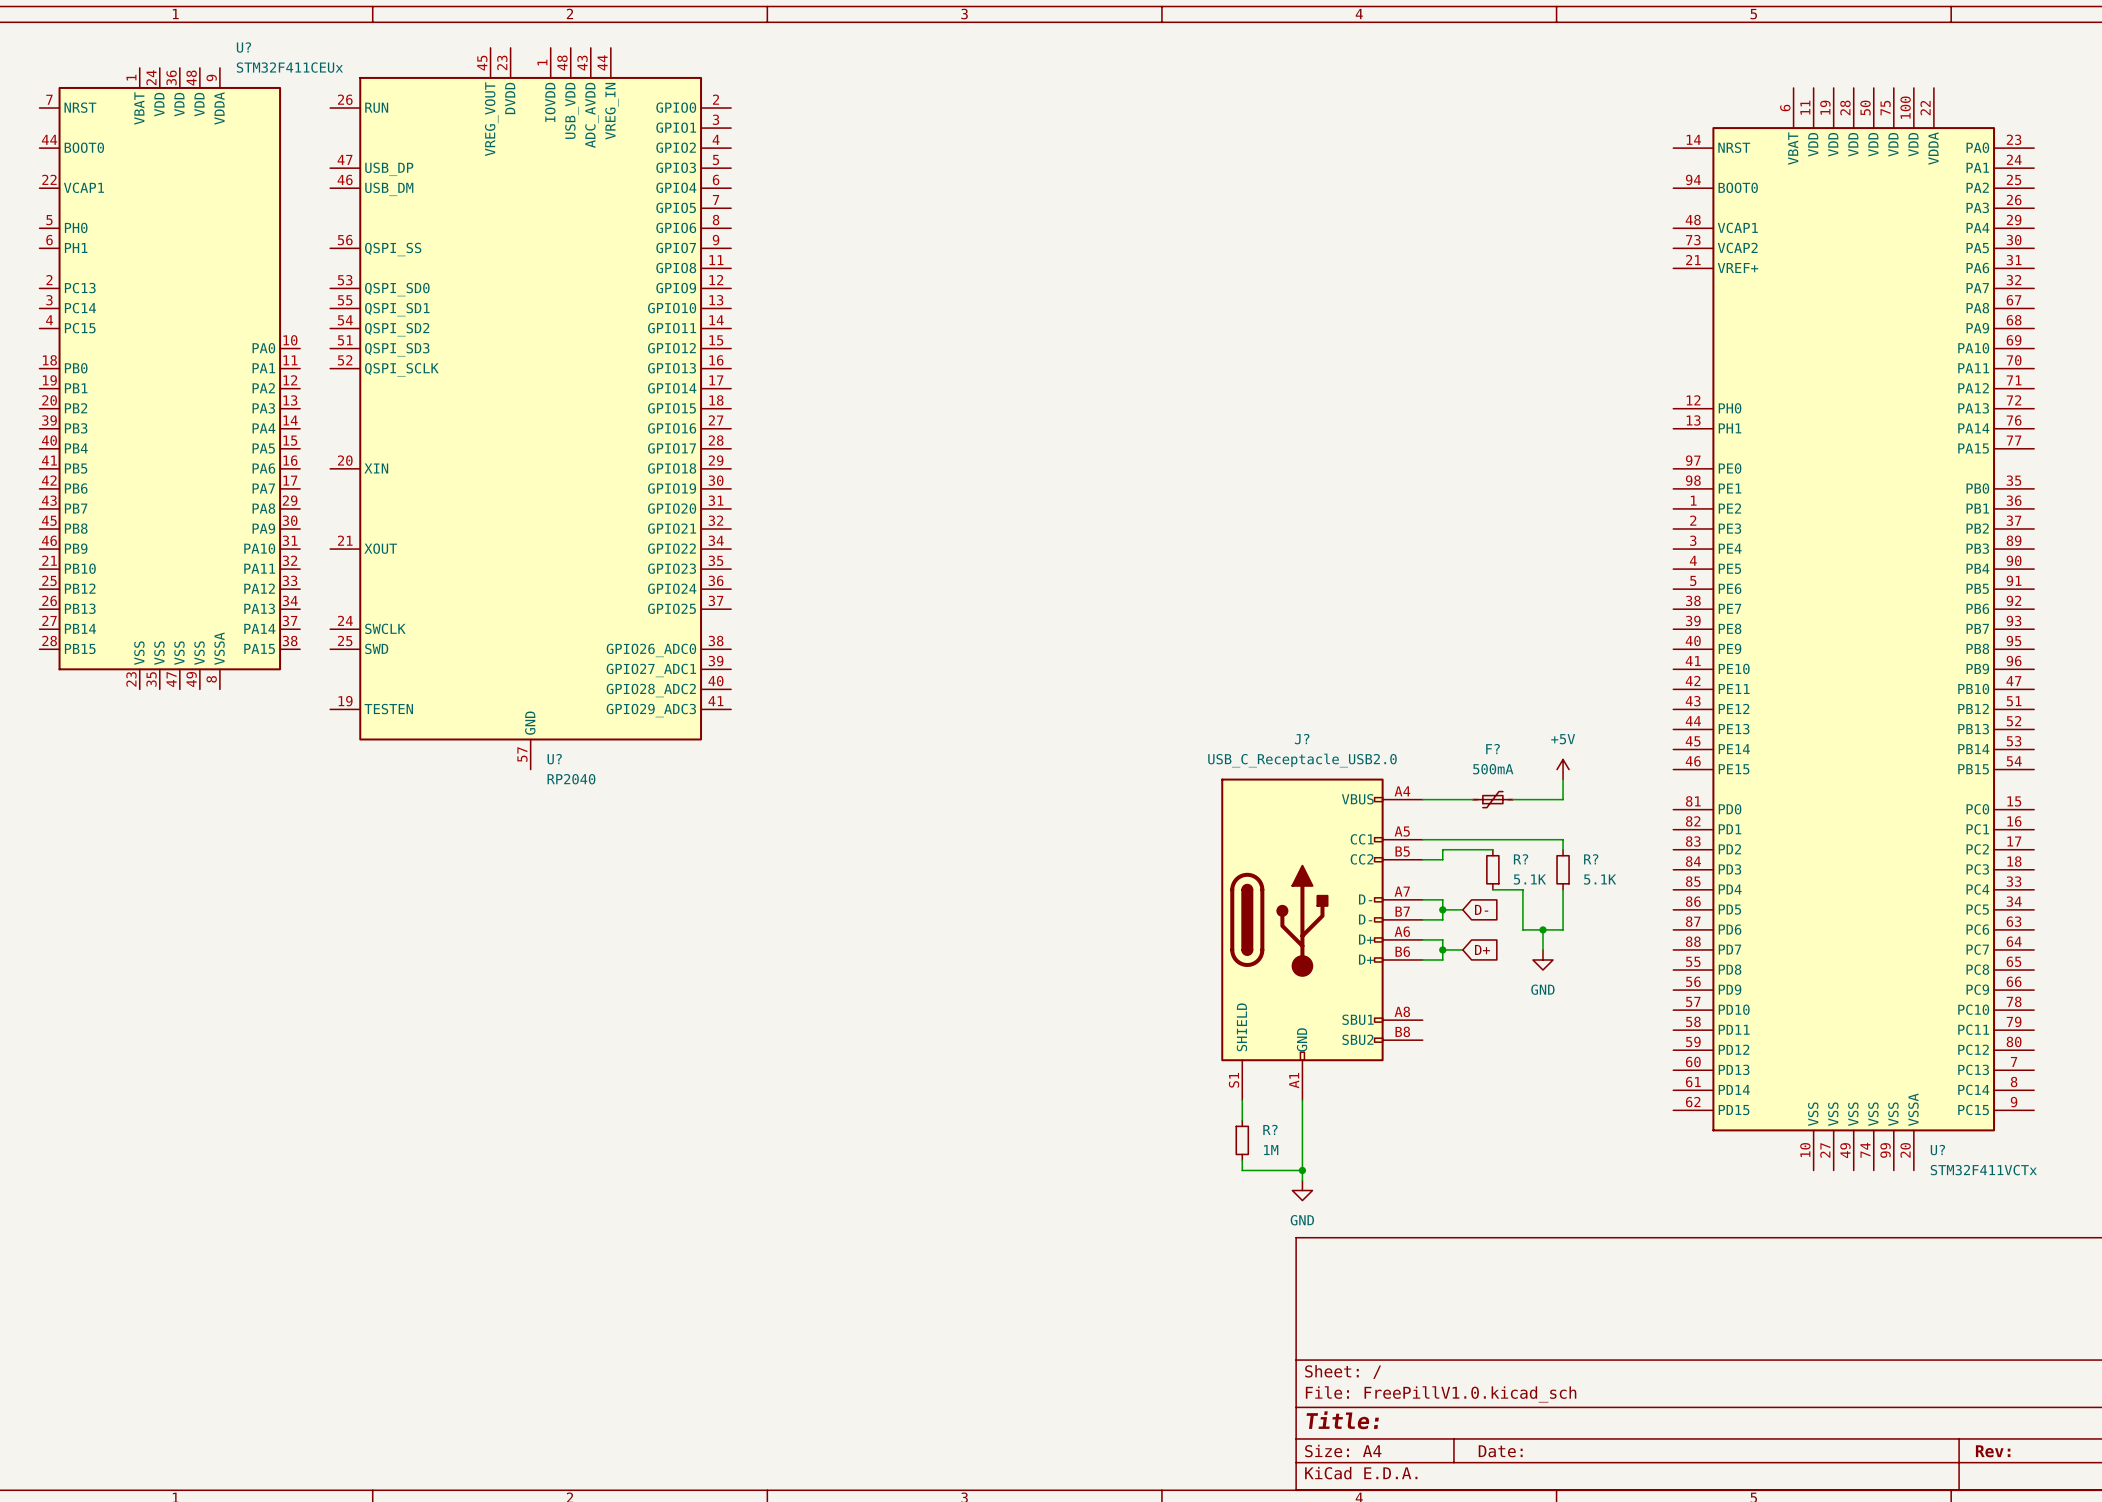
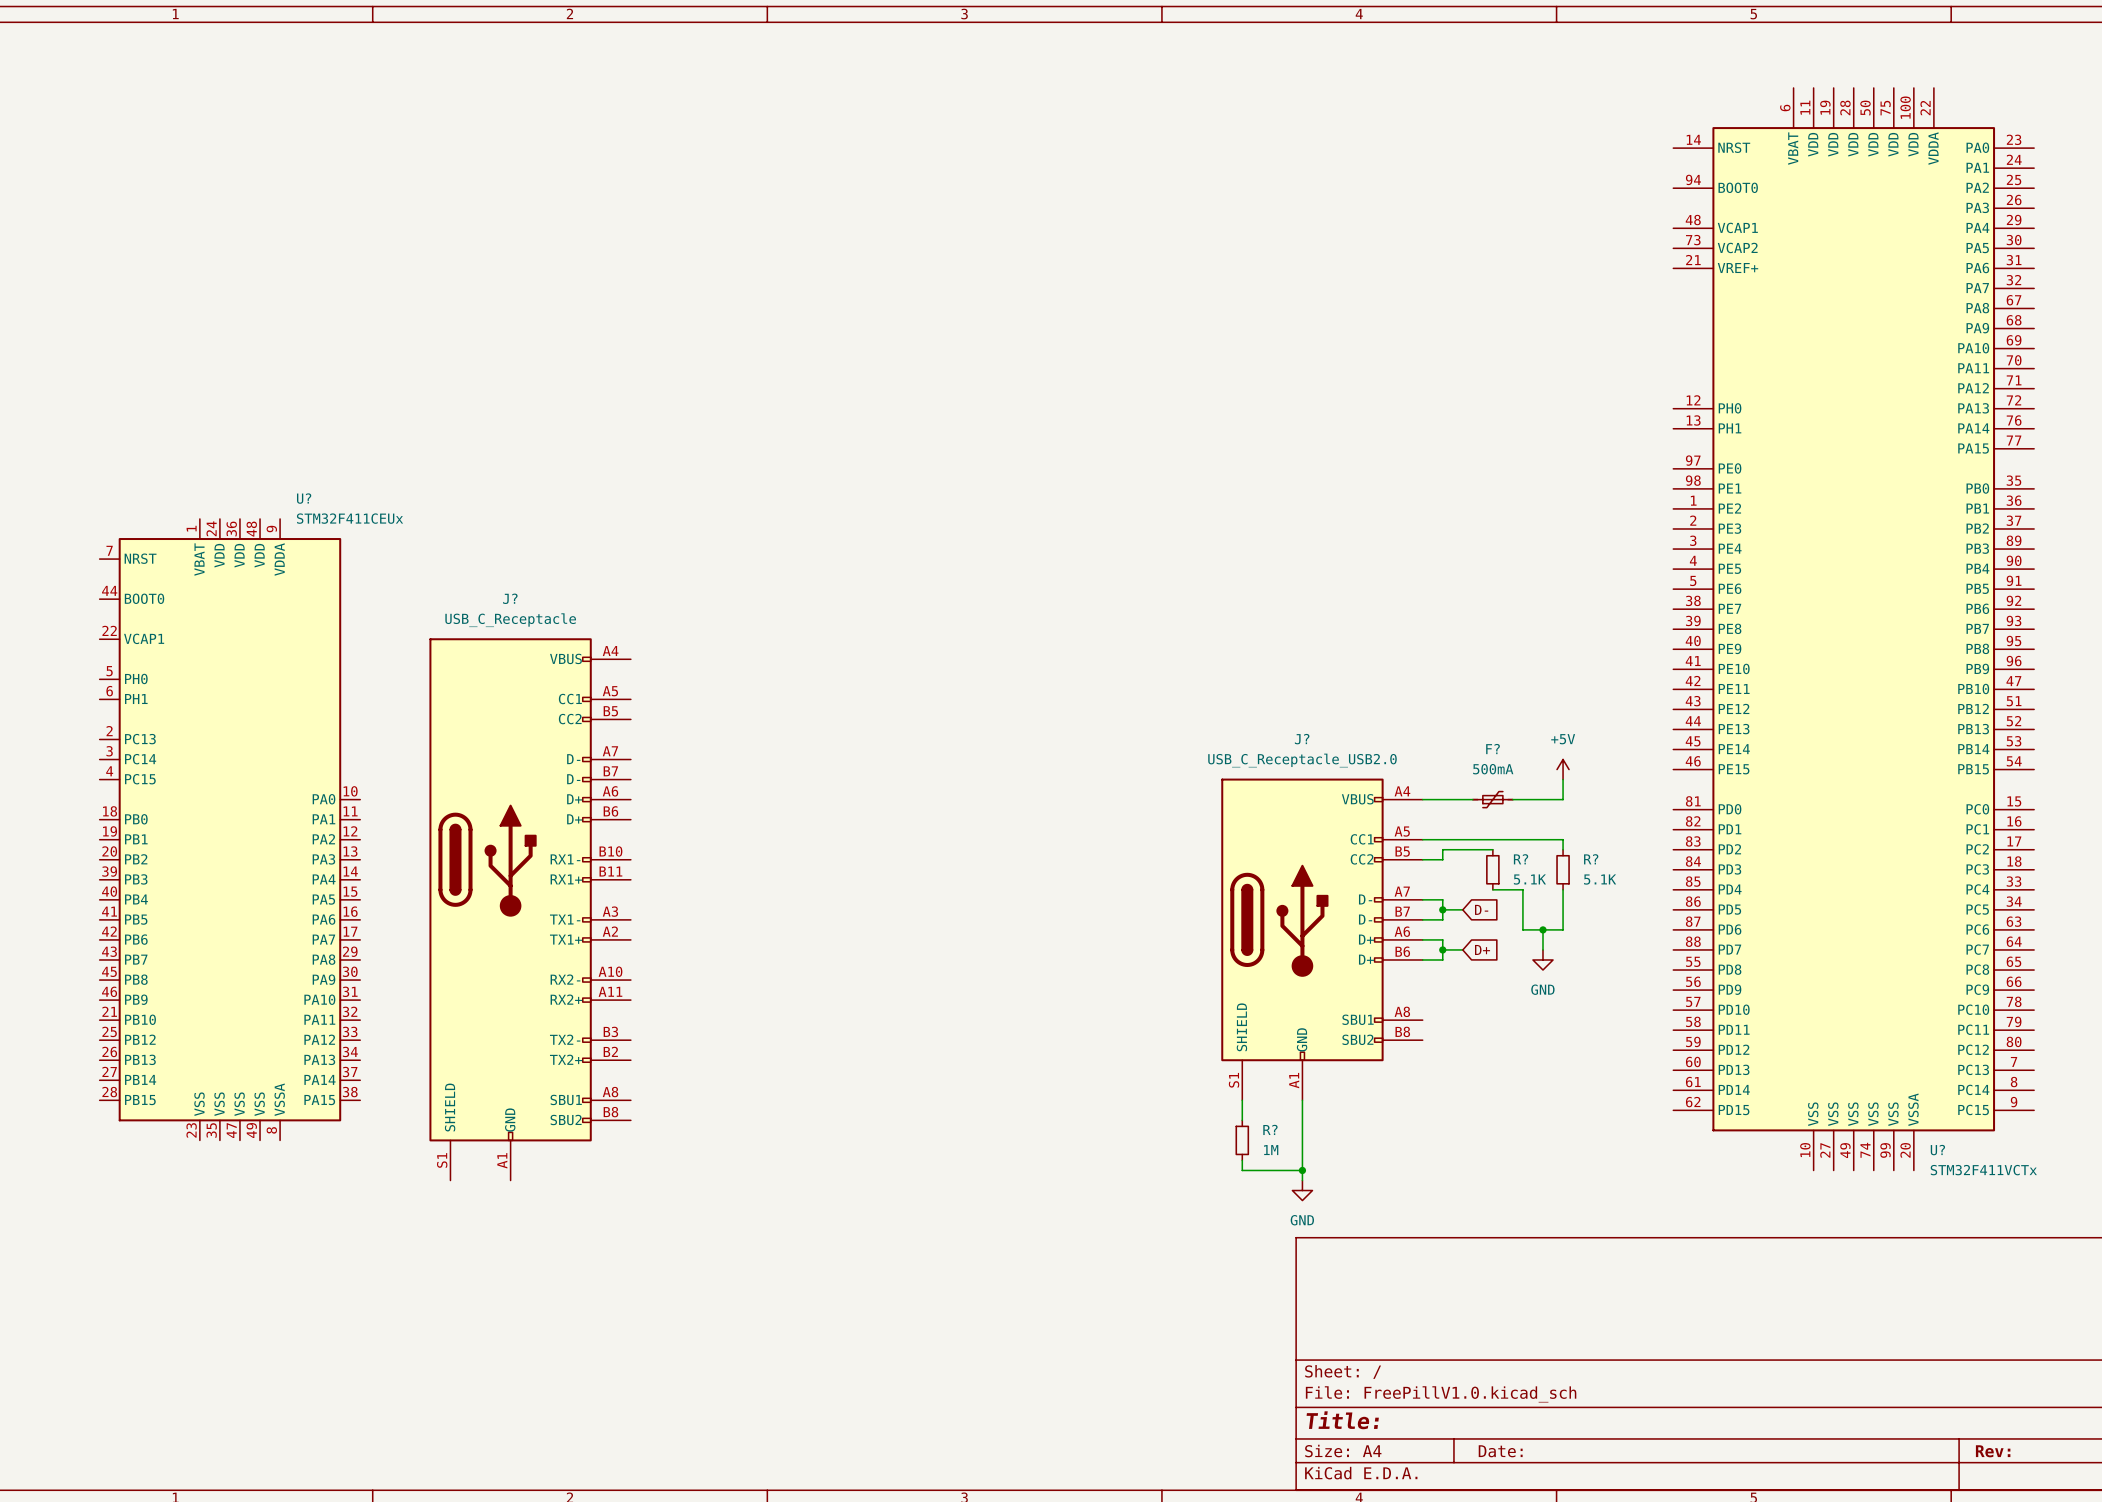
U?: STM32F411CEUx (169, 378) -> none
U?: RP2040 (530, 408) -> none
U?: none -> STM32F411CEUx (229, 829)
J?: none -> USB_C_Receptacle (530, 909)

